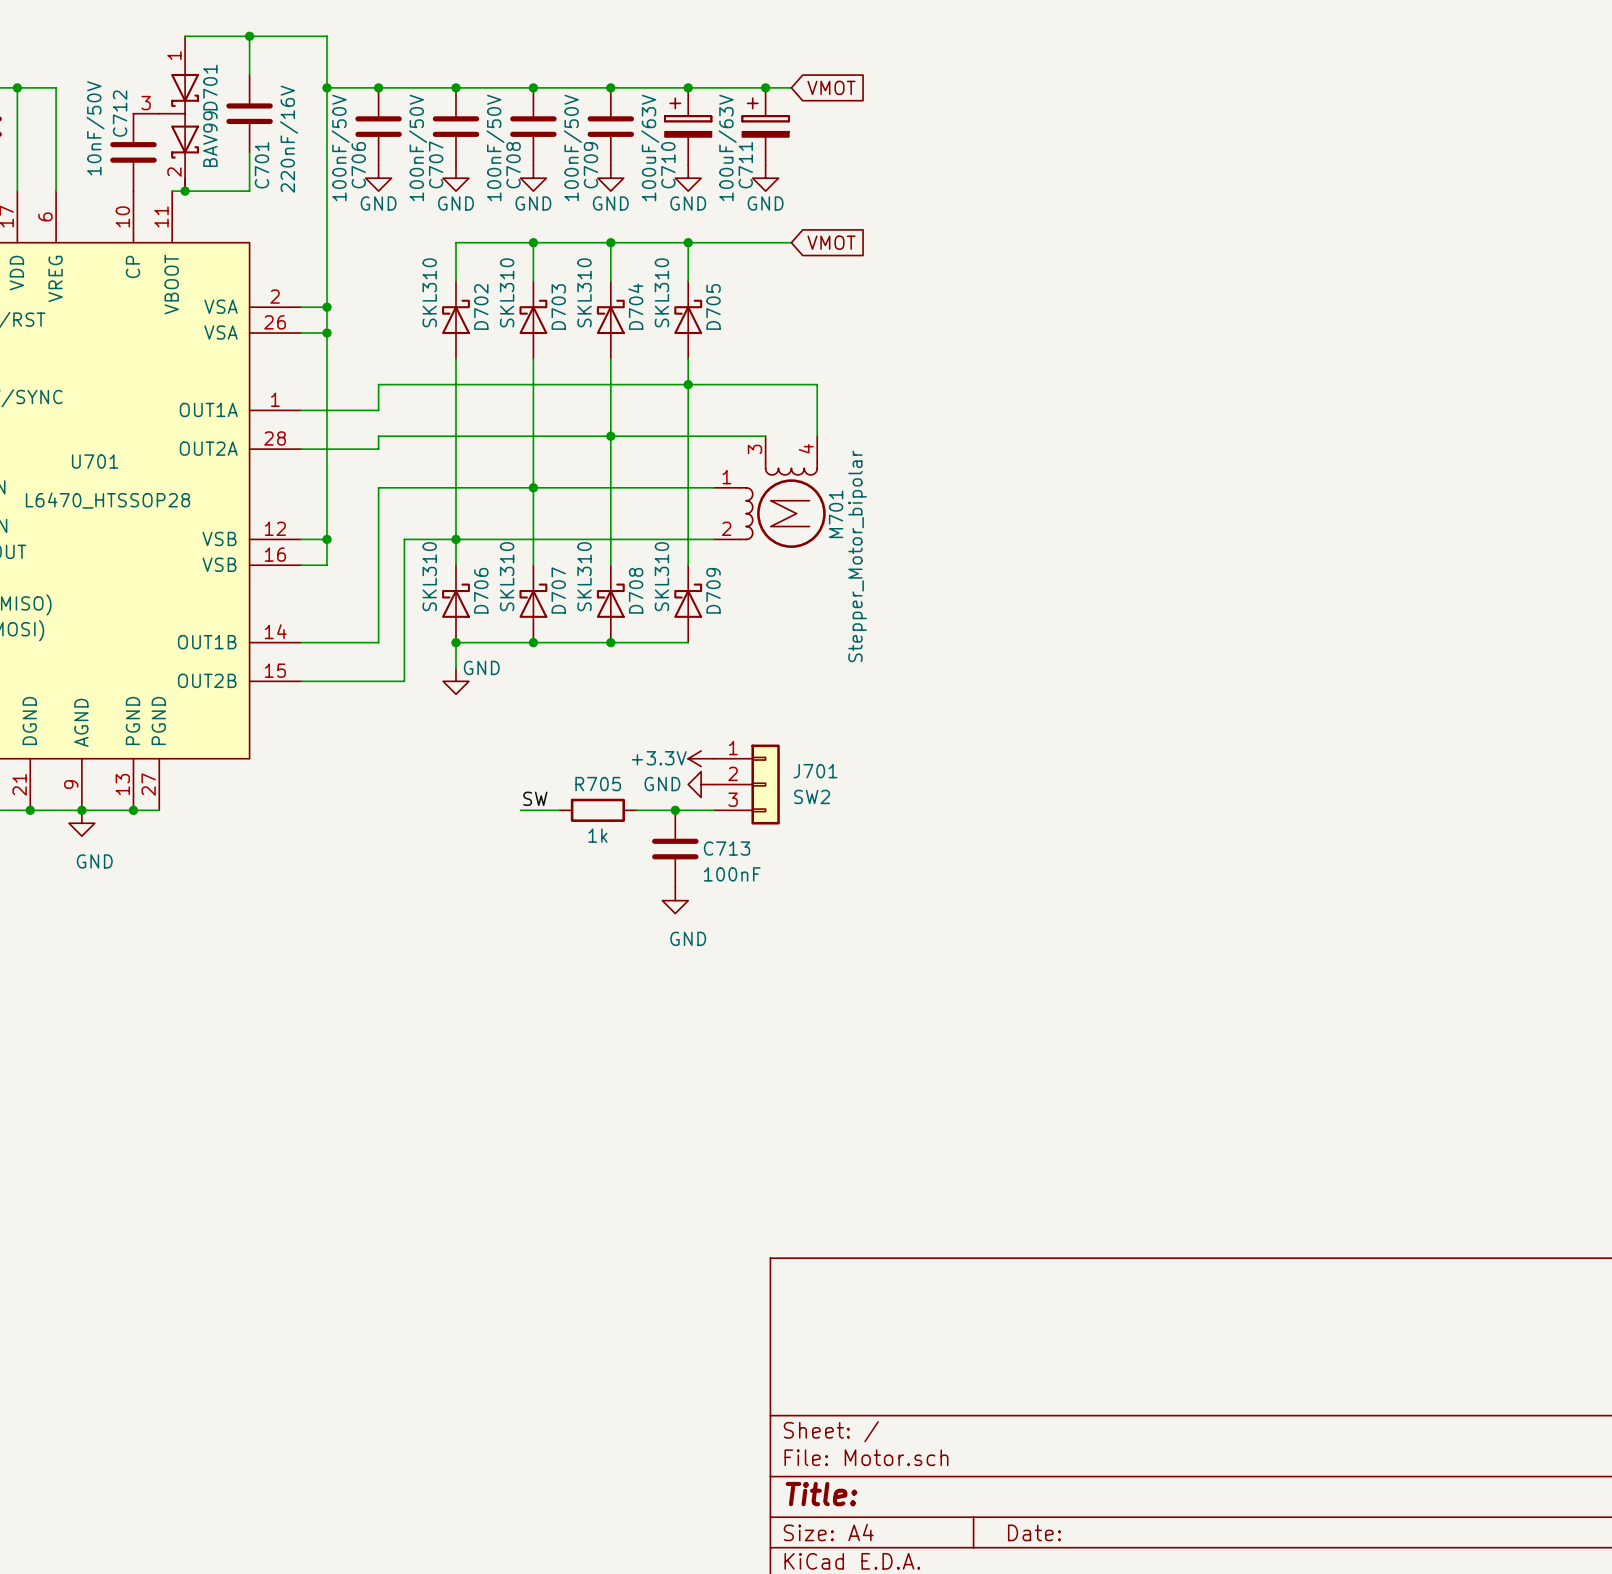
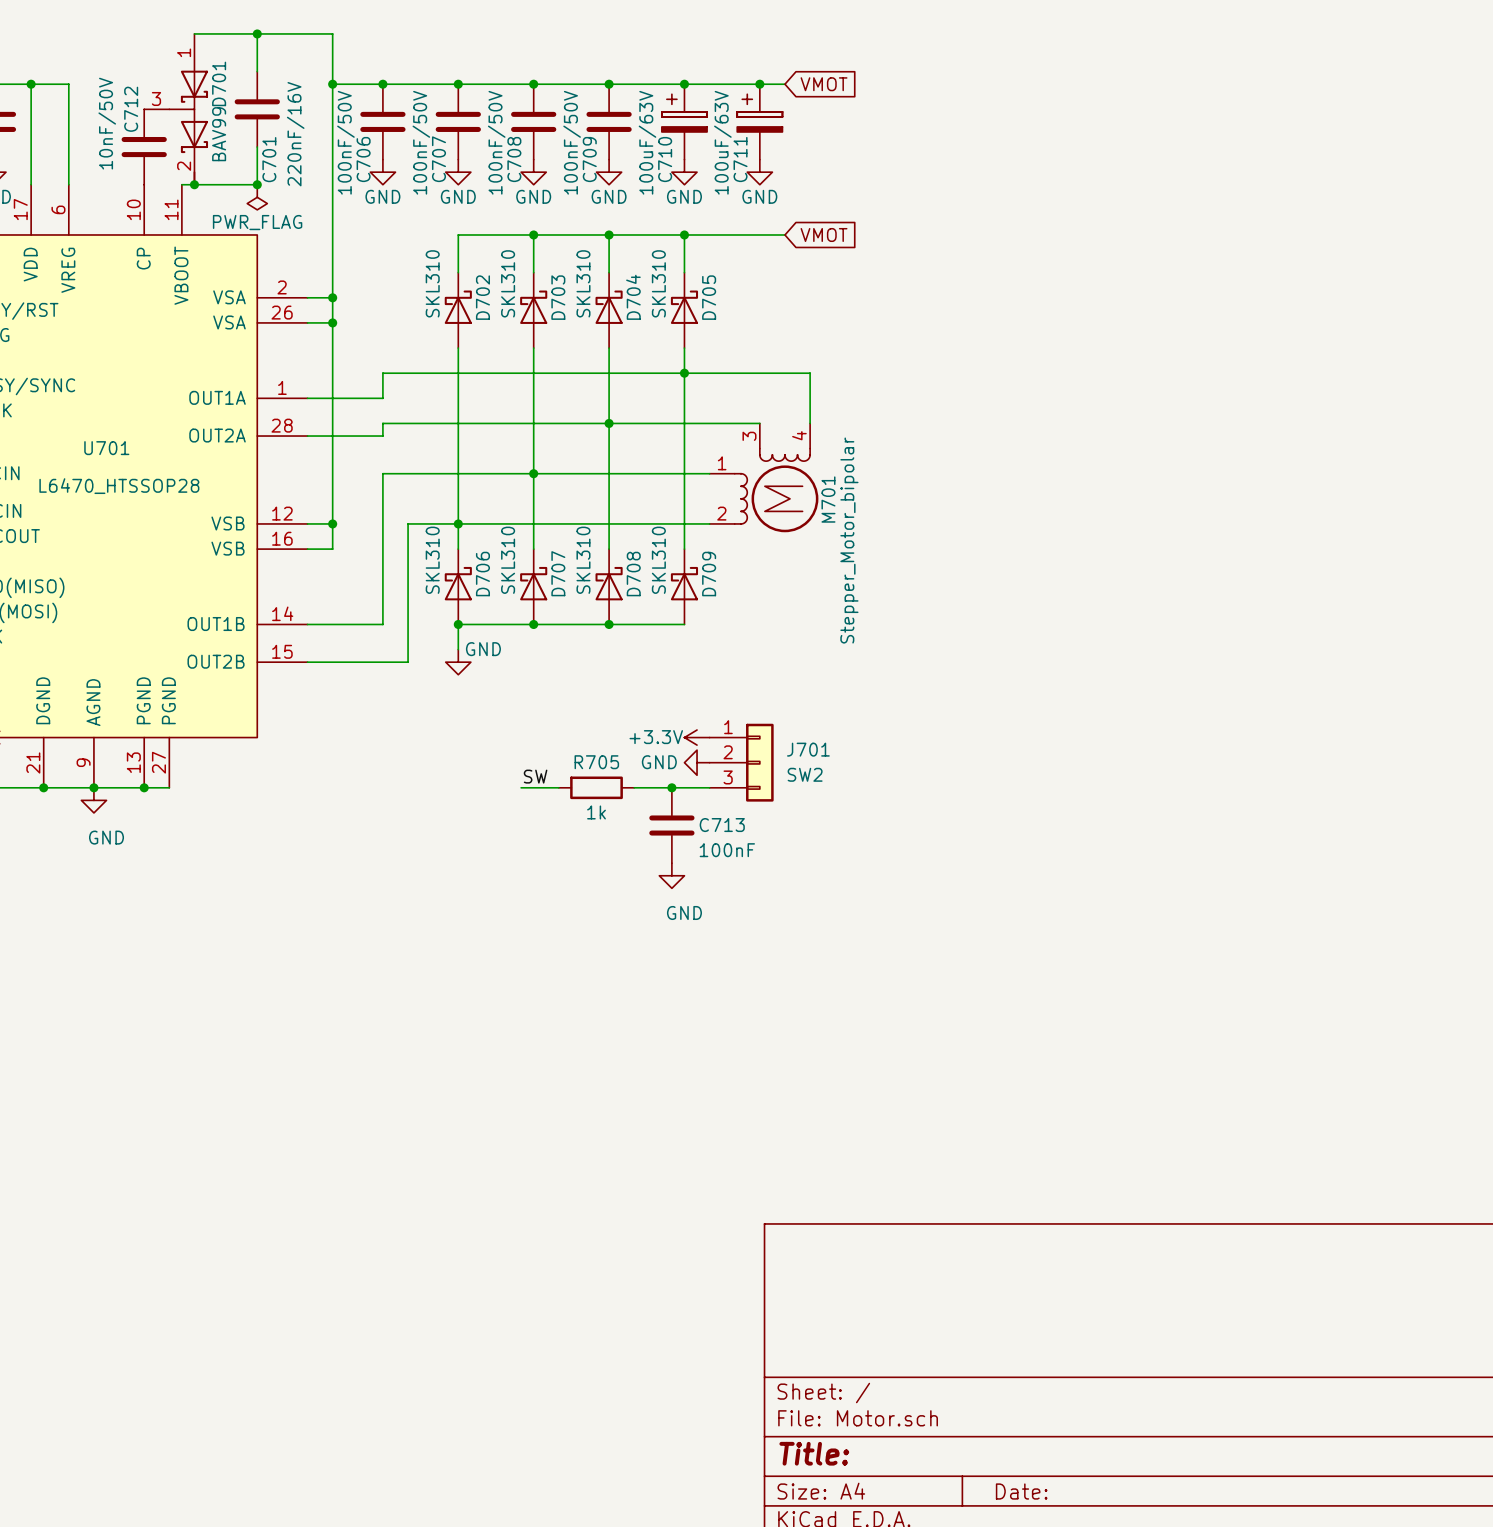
junction: none -> (257, 184)
power symbol: none -> PWR_FLAG (257, 197)

